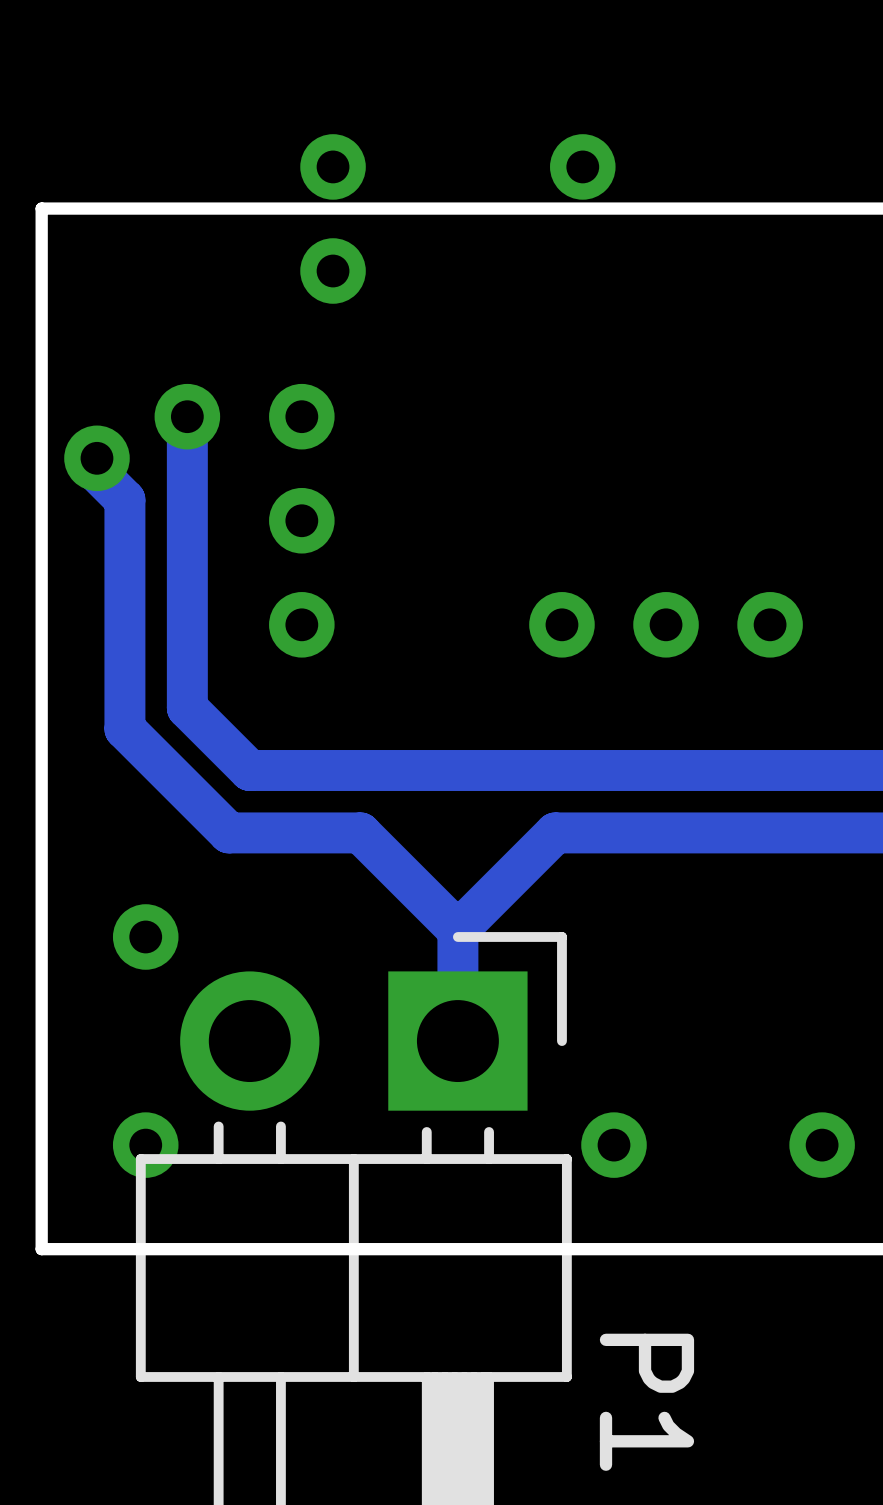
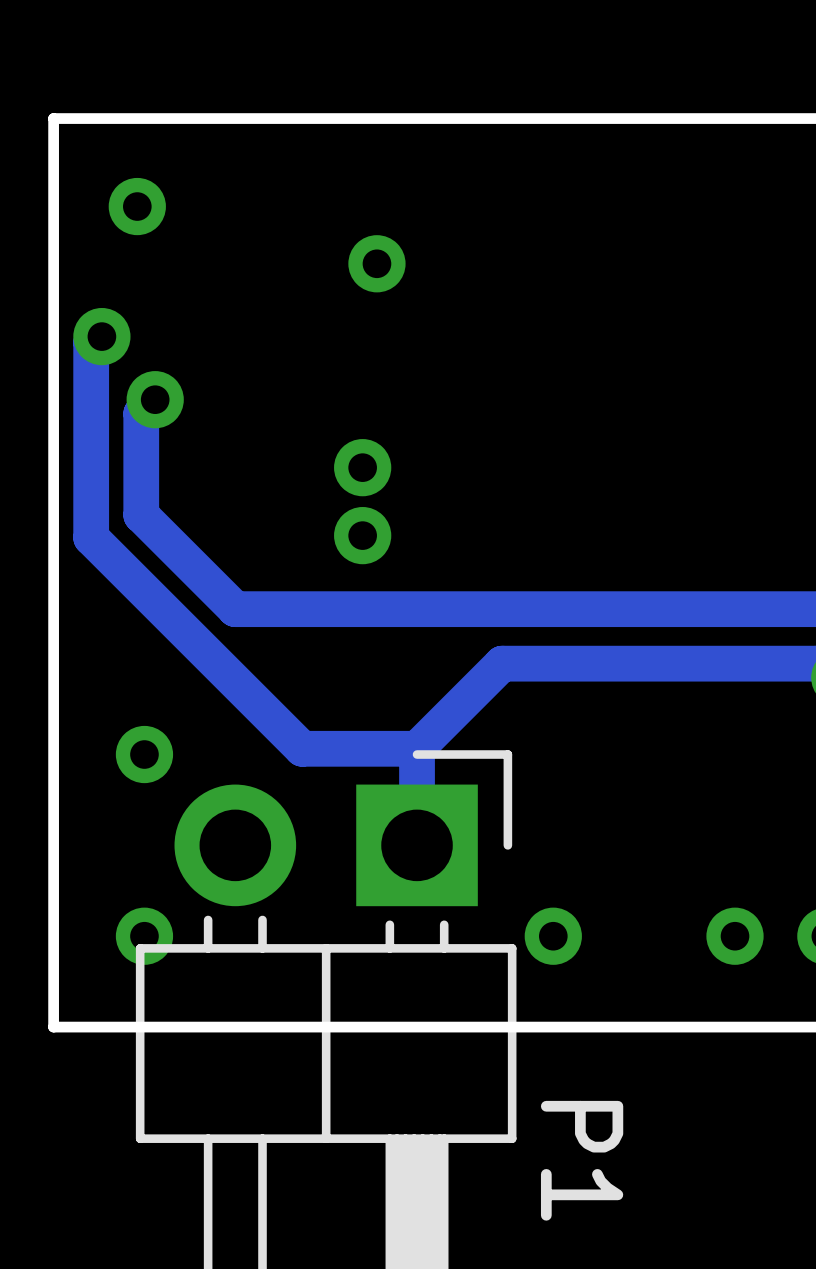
via: (333, 166) -> none
via: (582, 166) -> none
via: (333, 271) -> none
via: none -> (137, 206)
via: none -> (376, 263)
track: (187, 416) (187, 708) -> (155, 399) (141, 413) (141, 515) (180, 554)
via: (187, 416) -> none
via: (301, 416) -> none
track: (96, 458) (96, 471) (124, 499) (124, 728) -> (101, 331) (91, 342) (91, 537) (126, 572)
via: (301, 520) -> none
via: none -> (155, 399)
via: none -> (362, 467)
via: (301, 624) -> none
via: (561, 624) -> none
via: (666, 624) -> none
via: (770, 624) -> none
via: none -> (362, 535)
track: (228, 832) (360, 832) (457, 930) -> (217, 663) (302, 748) (417, 748)

